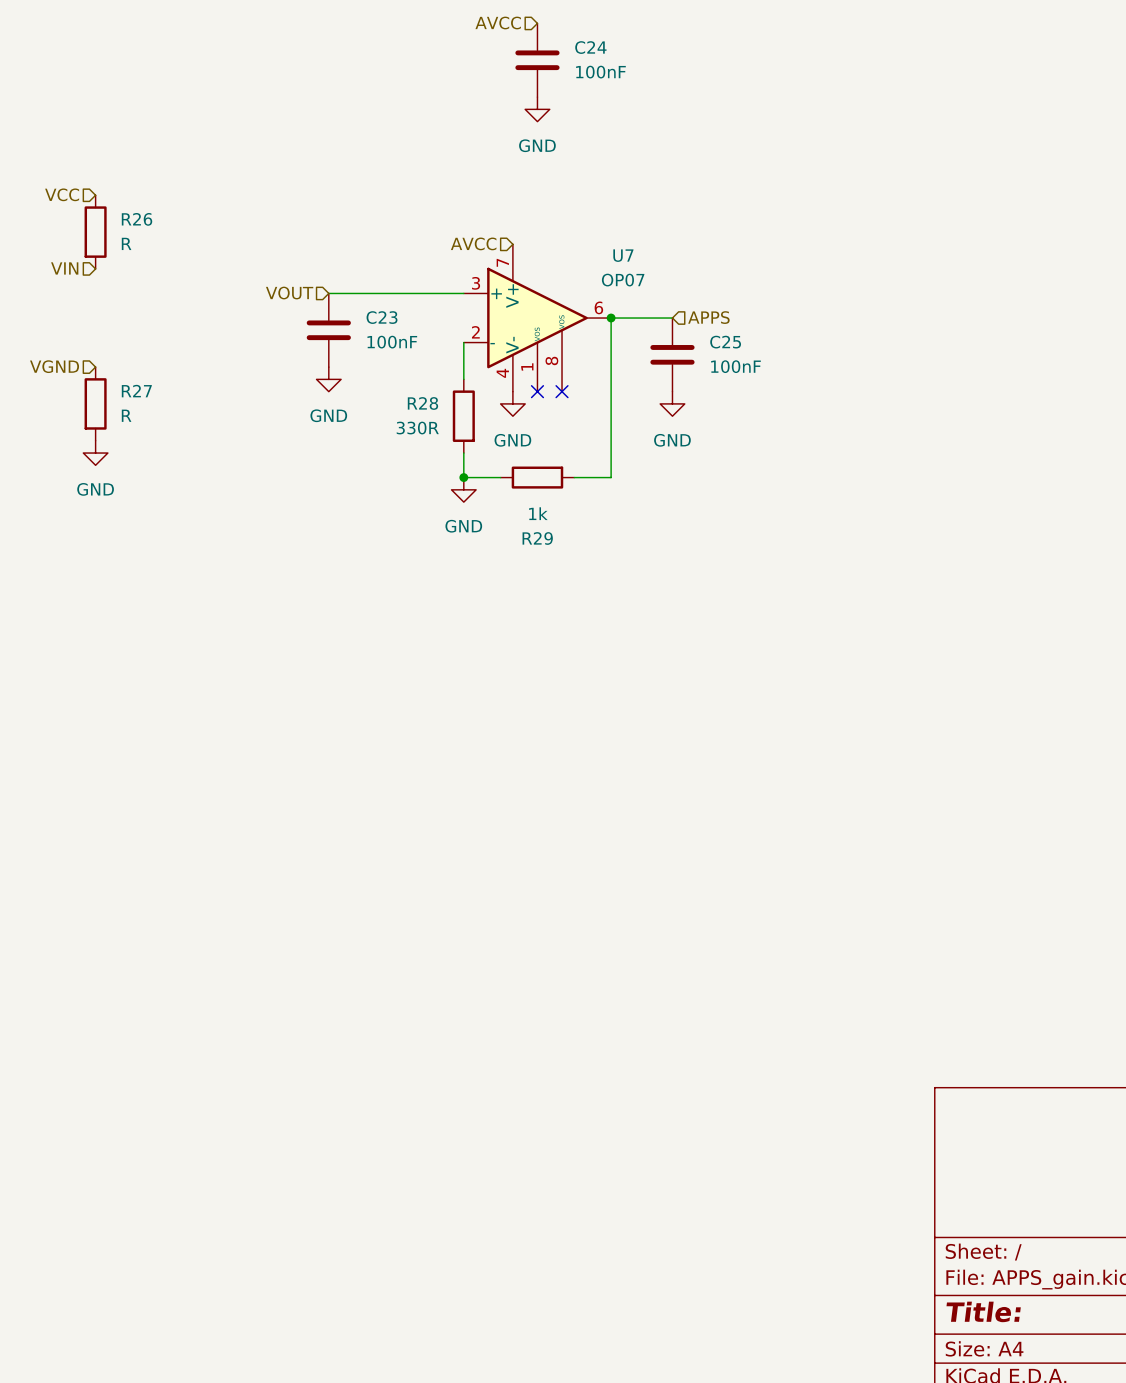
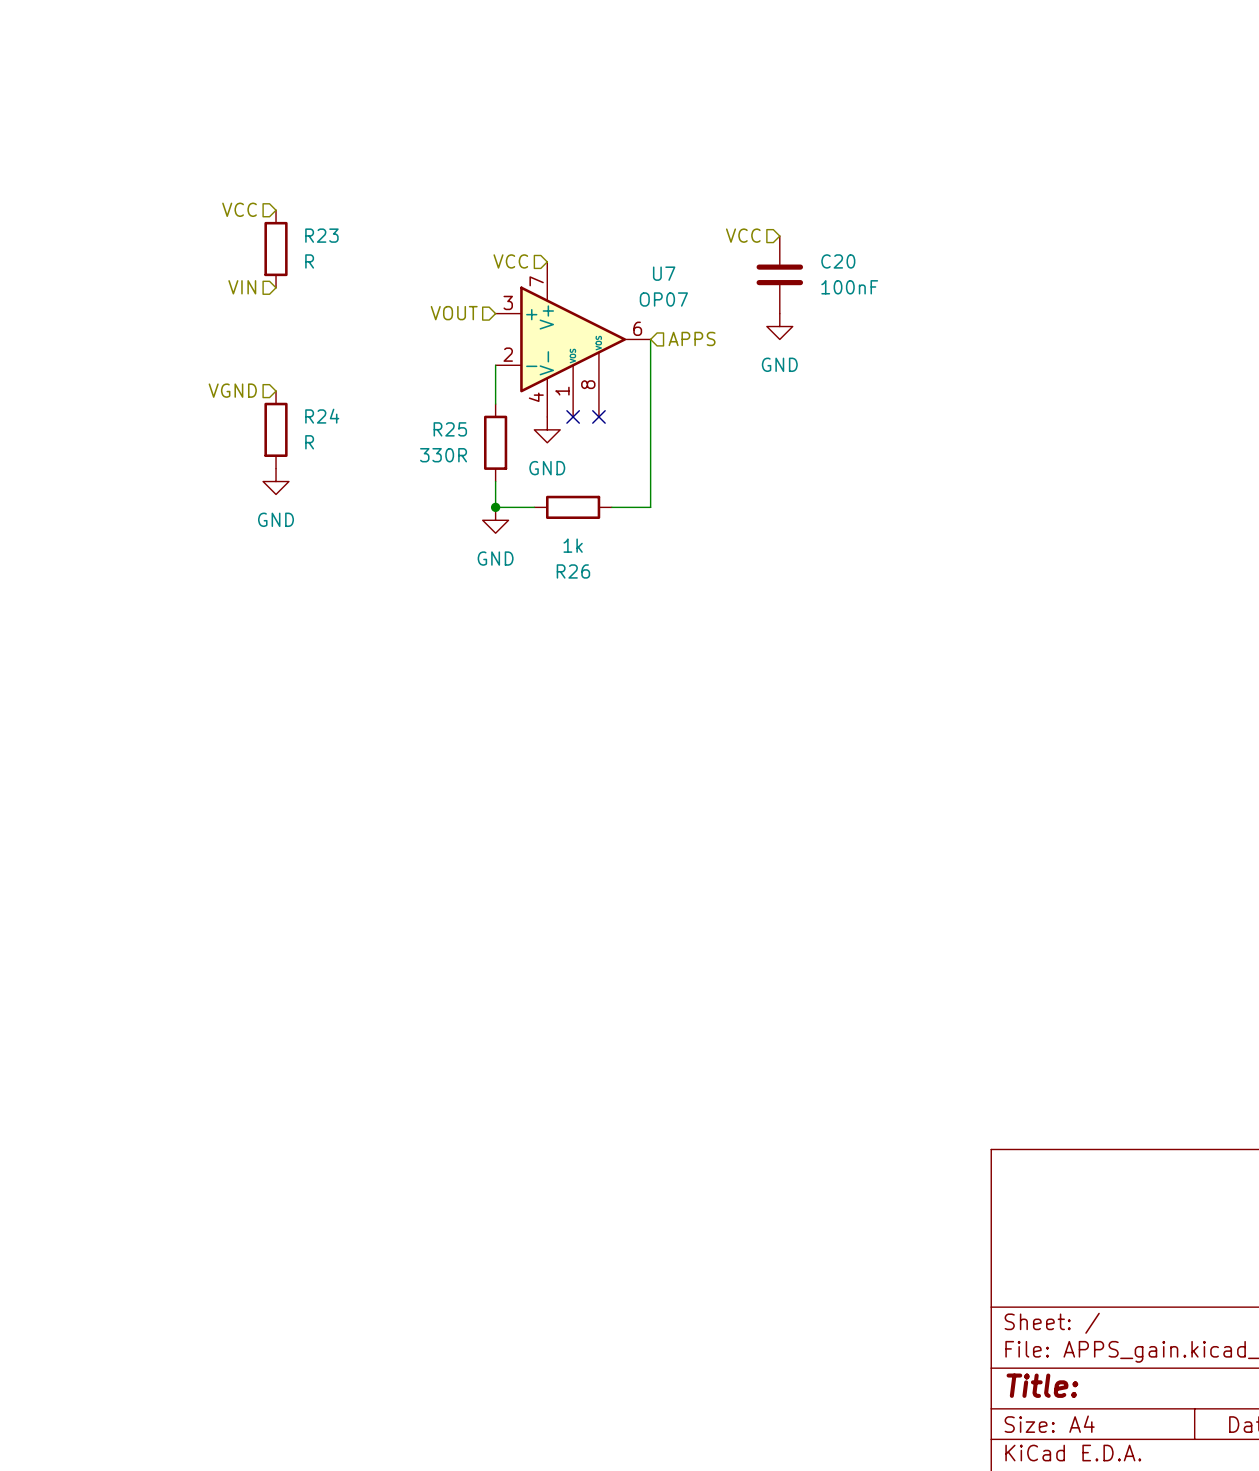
hierarchical label: AVCC (498, 22) -> none
C24: 100nF (537, 60) -> none
power symbol: GND (537, 109) -> none
hierarchical label position: VCC (62, 194) -> VCC (239, 209)
hierarchical label: none -> VCC (743, 235)
R26: R (95, 232) -> none
R23: none -> R (276, 249)
hierarchical label: AVCC (473, 243) -> VCC (510, 261)
C20: none -> 100nF (779, 274)
hierarchical label position: VIN (64, 268) -> VIN (242, 287)
hierarchical label position: VOUT (289, 293) -> VOUT (454, 313)
wire: (328, 293) (463, 293) -> none
hierarchical label position: APPS (708, 317) -> APPS (692, 338)
wire: (611, 318) (672, 318) -> none
junction: (611, 318) -> none
C23: 100nF (328, 330) -> none
C25: 100nF (672, 354) -> none
hierarchical label position: VGND (54, 366) -> VGND (232, 390)
power symbol: GND (328, 379) -> none
R27: R (95, 403) -> none
R24: none -> R (276, 429)
R28 name: R28 (422, 403) -> R25 (450, 429)
power symbol position: GND (672, 403) -> GND (779, 326)
power symbol: GND (95, 453) -> none
power symbol: none -> GND (276, 481)
R29 name: R29 (537, 538) -> R26 (573, 571)

